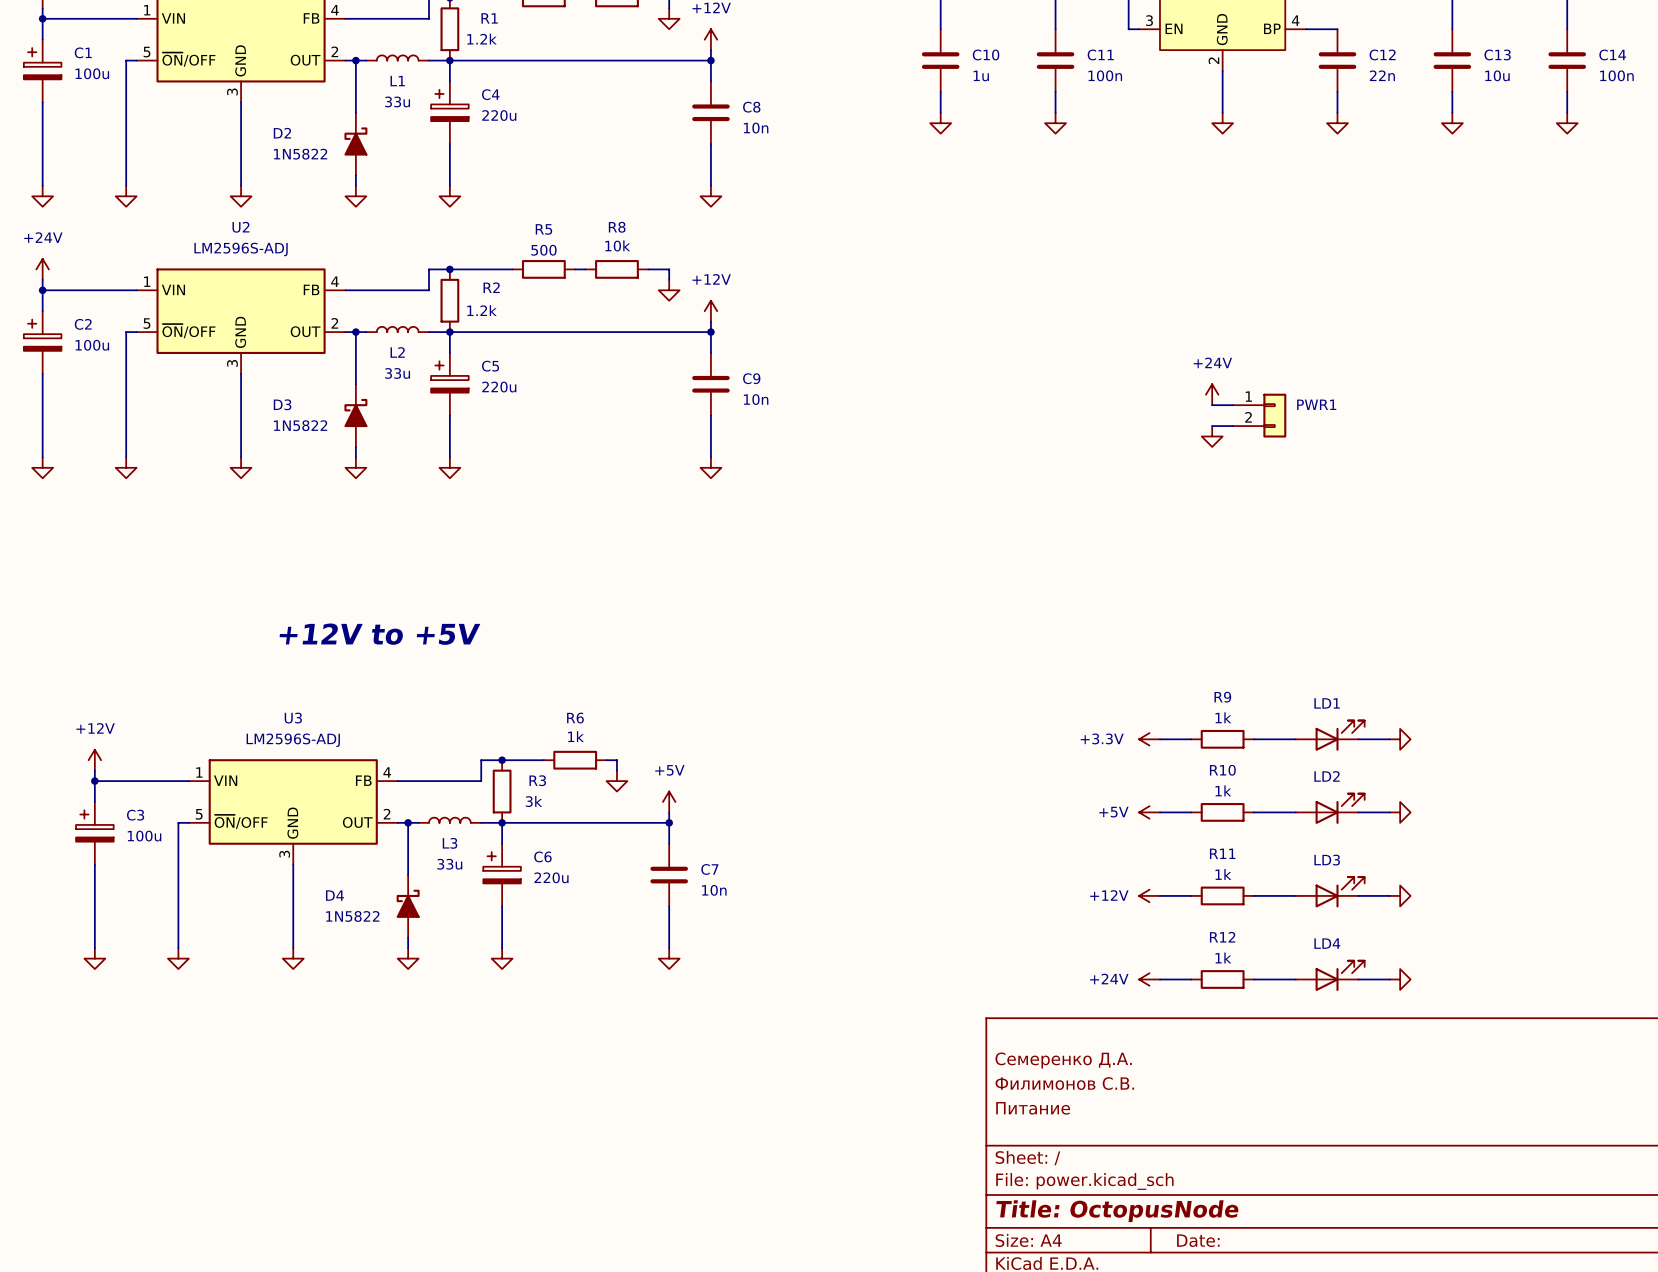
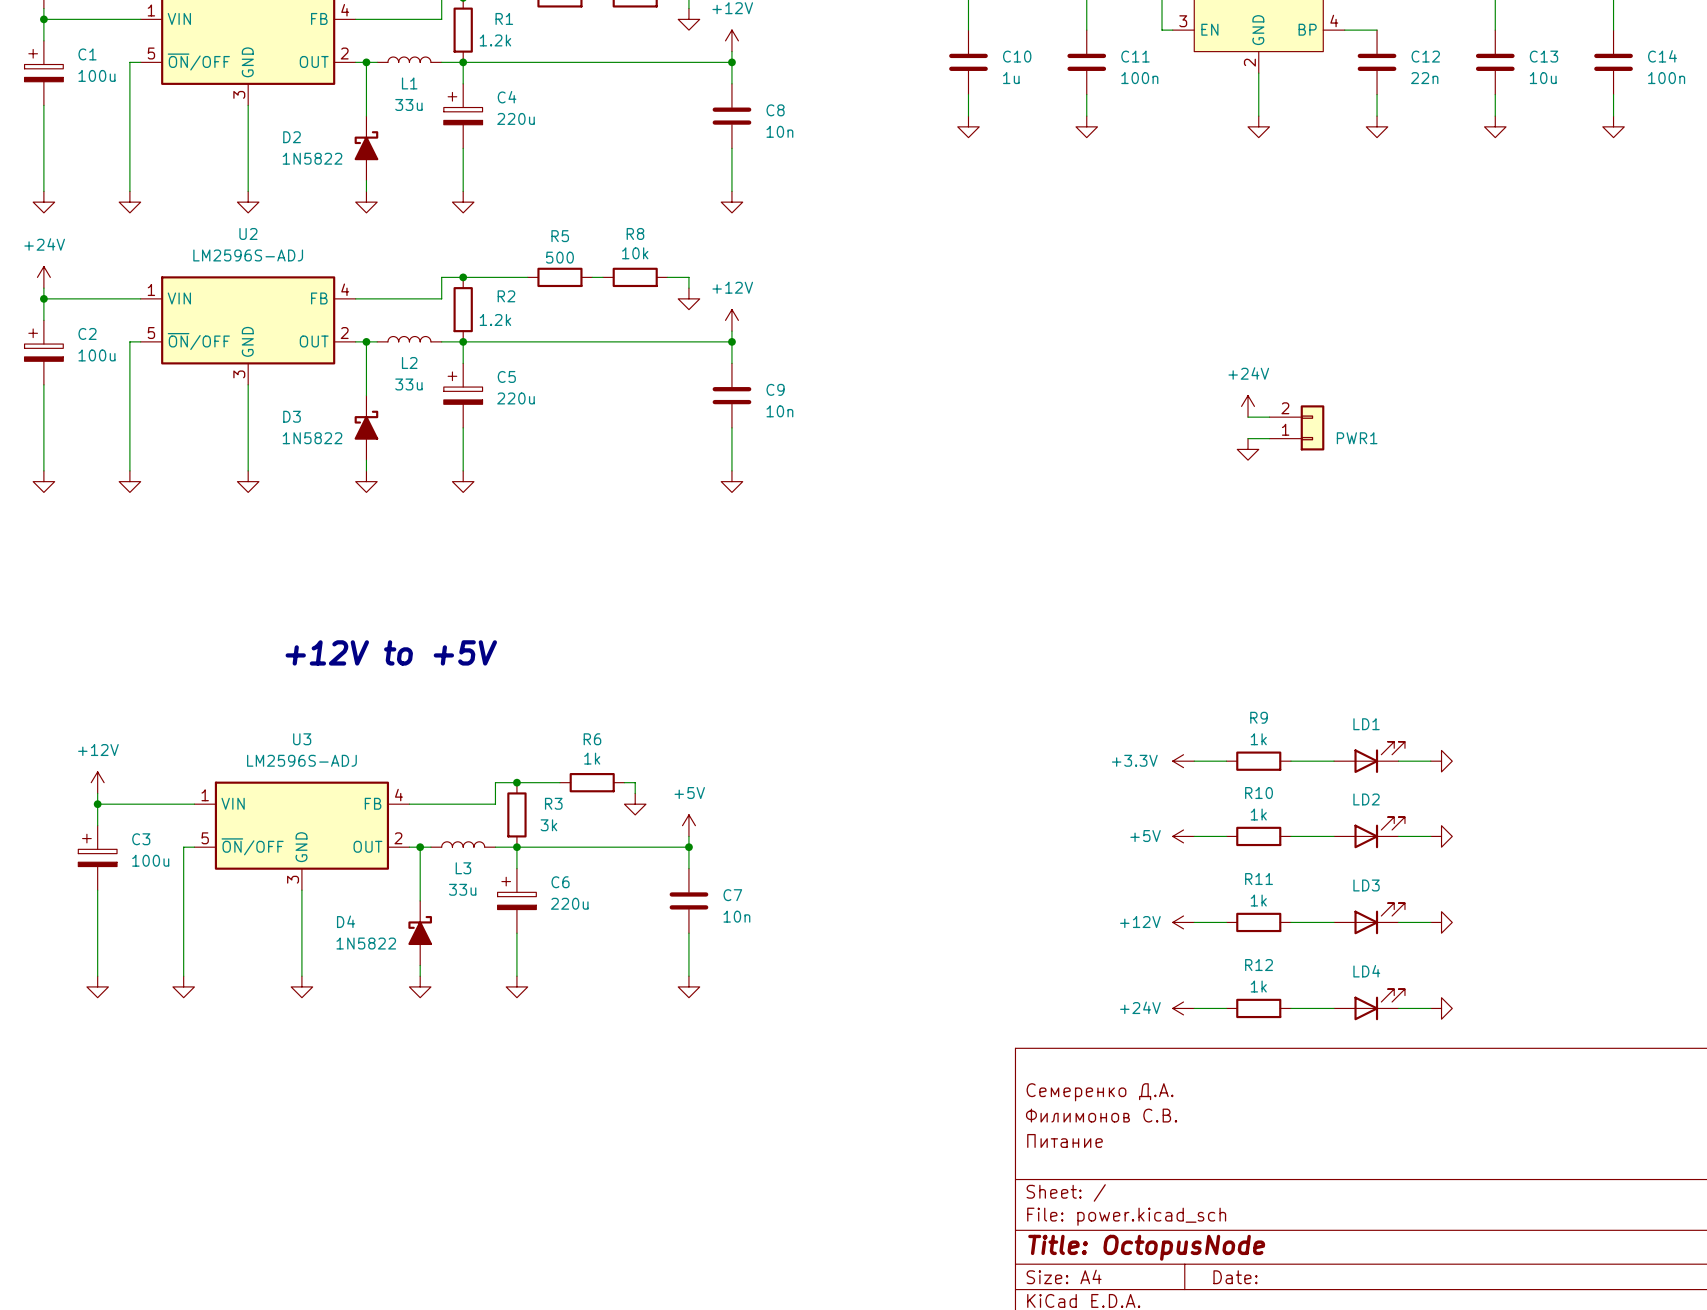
PWR1 flip: as is (1274, 415) -> up-down (1312, 427)

